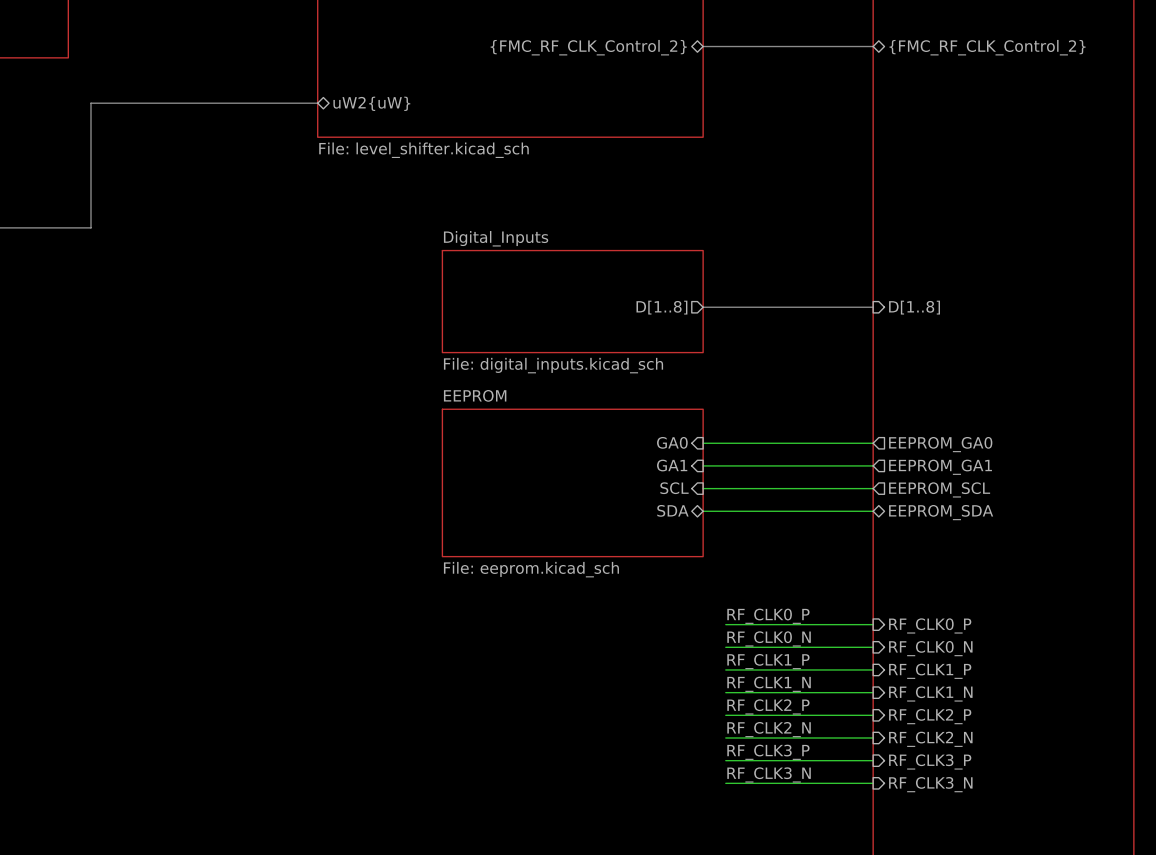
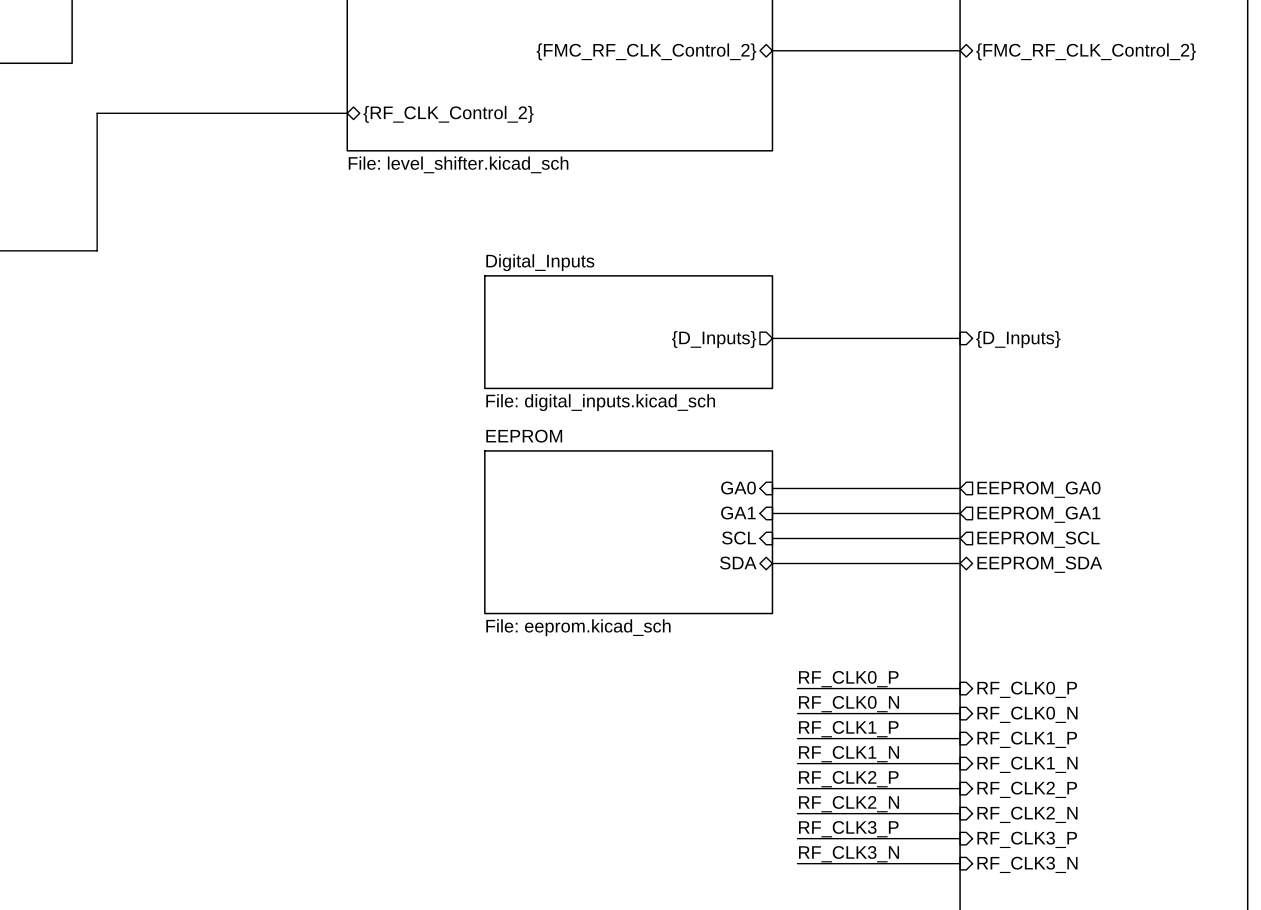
sheet pin: uW2{uW} (371, 103) -> {RF_CLK_Control_2} (448, 114)
sheet pin: D[1..8] (661, 307) -> {D_Inputs} (714, 339)
sheet pin: D[1..8] (914, 307) -> {D_Inputs} (1018, 339)

